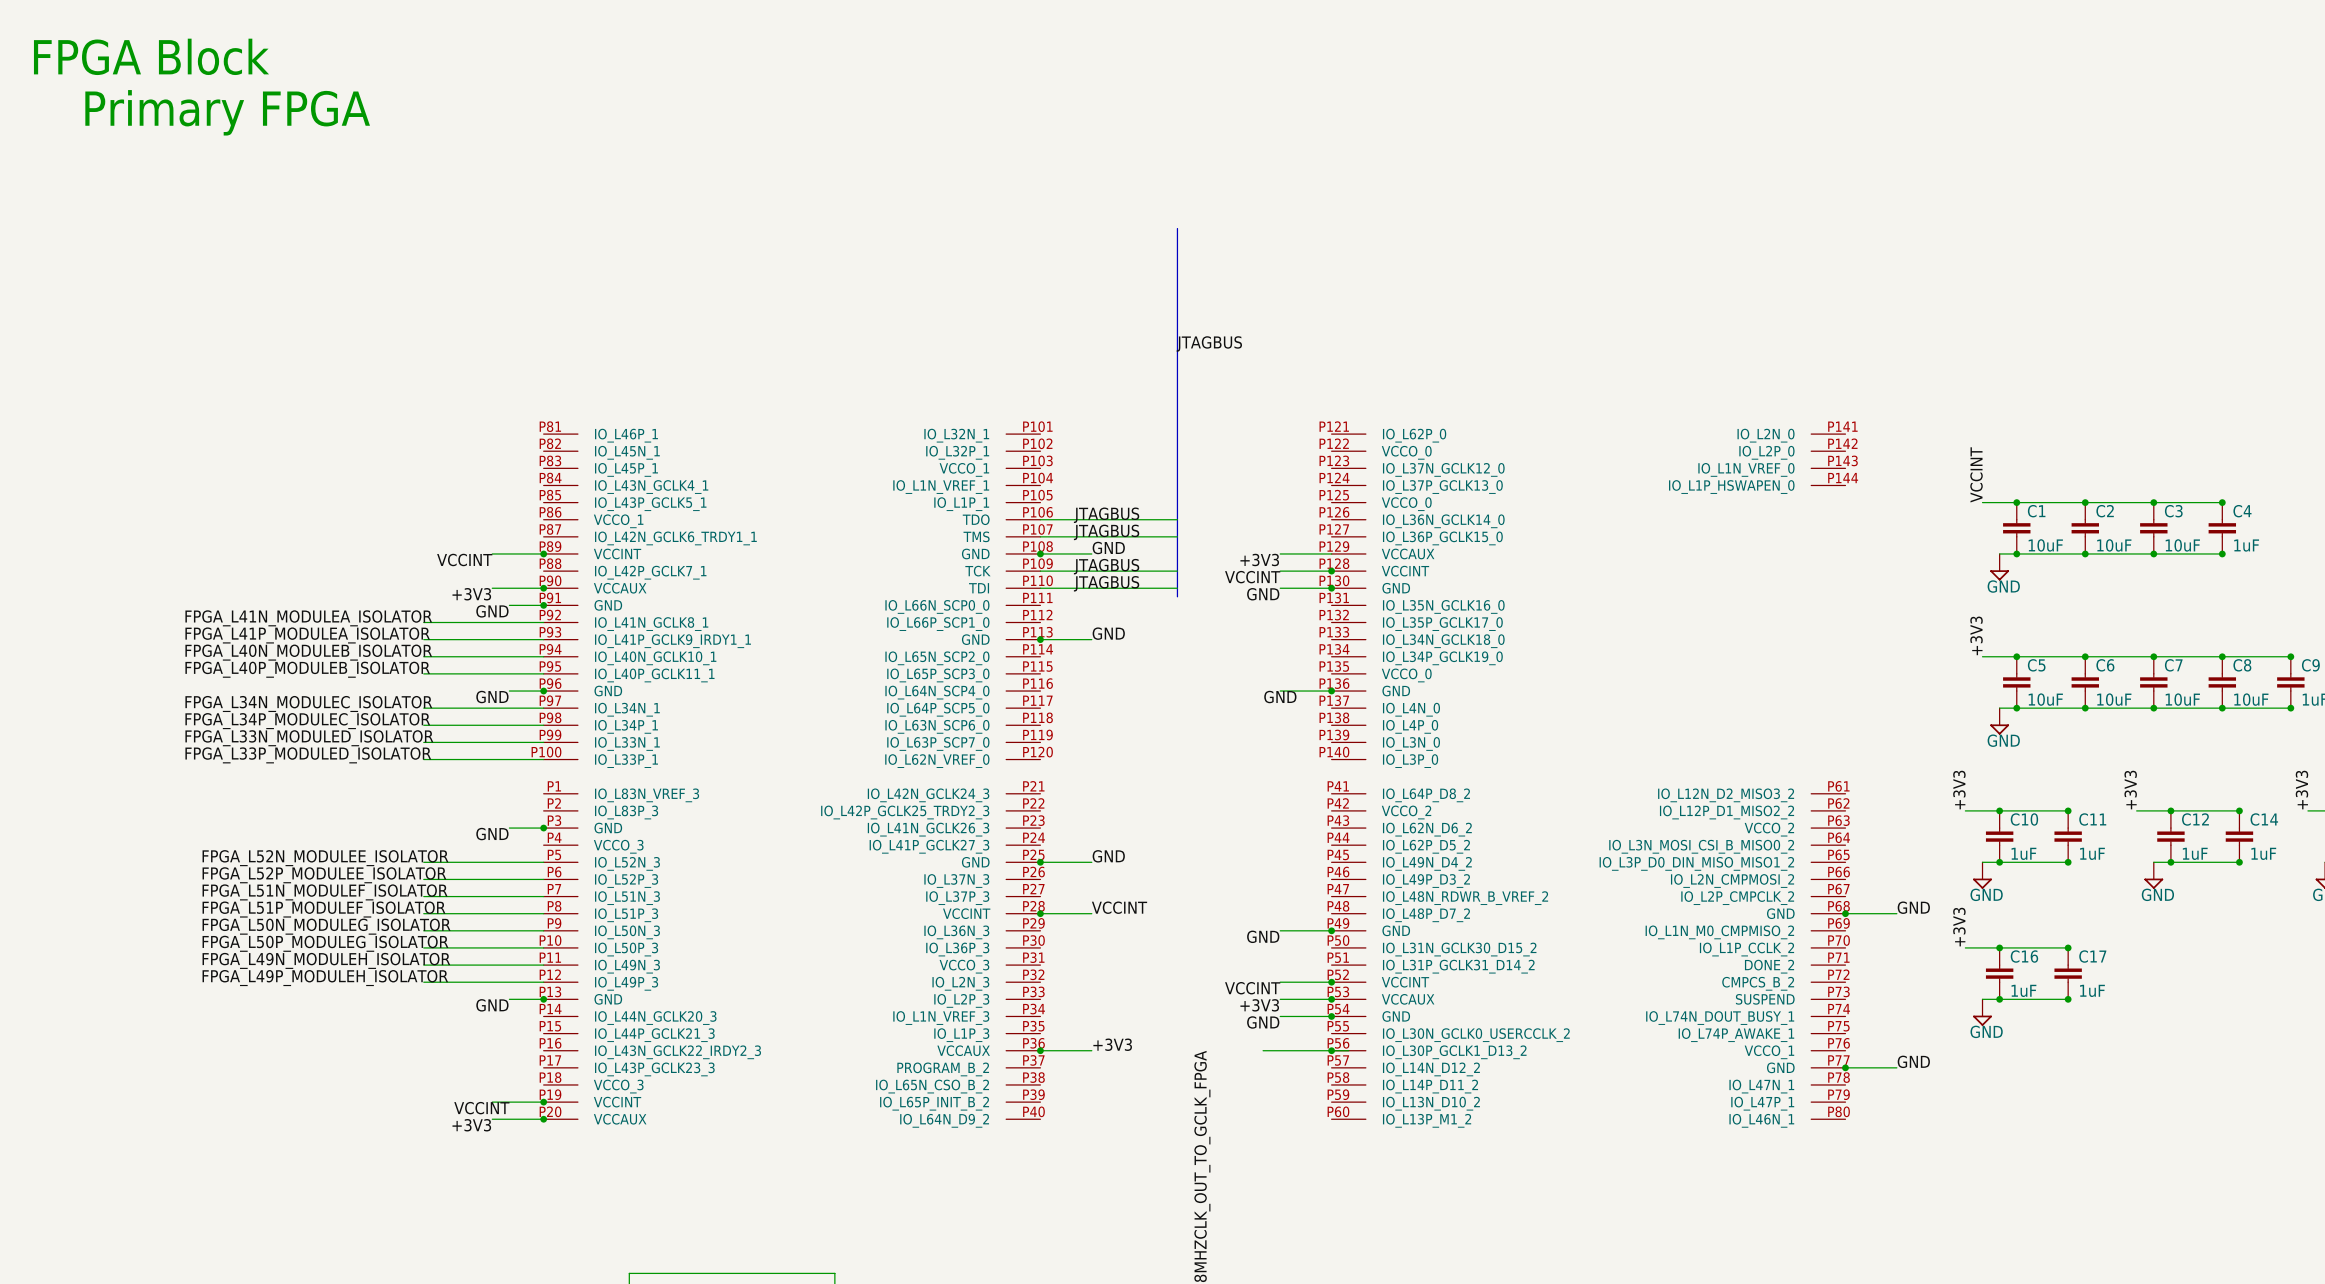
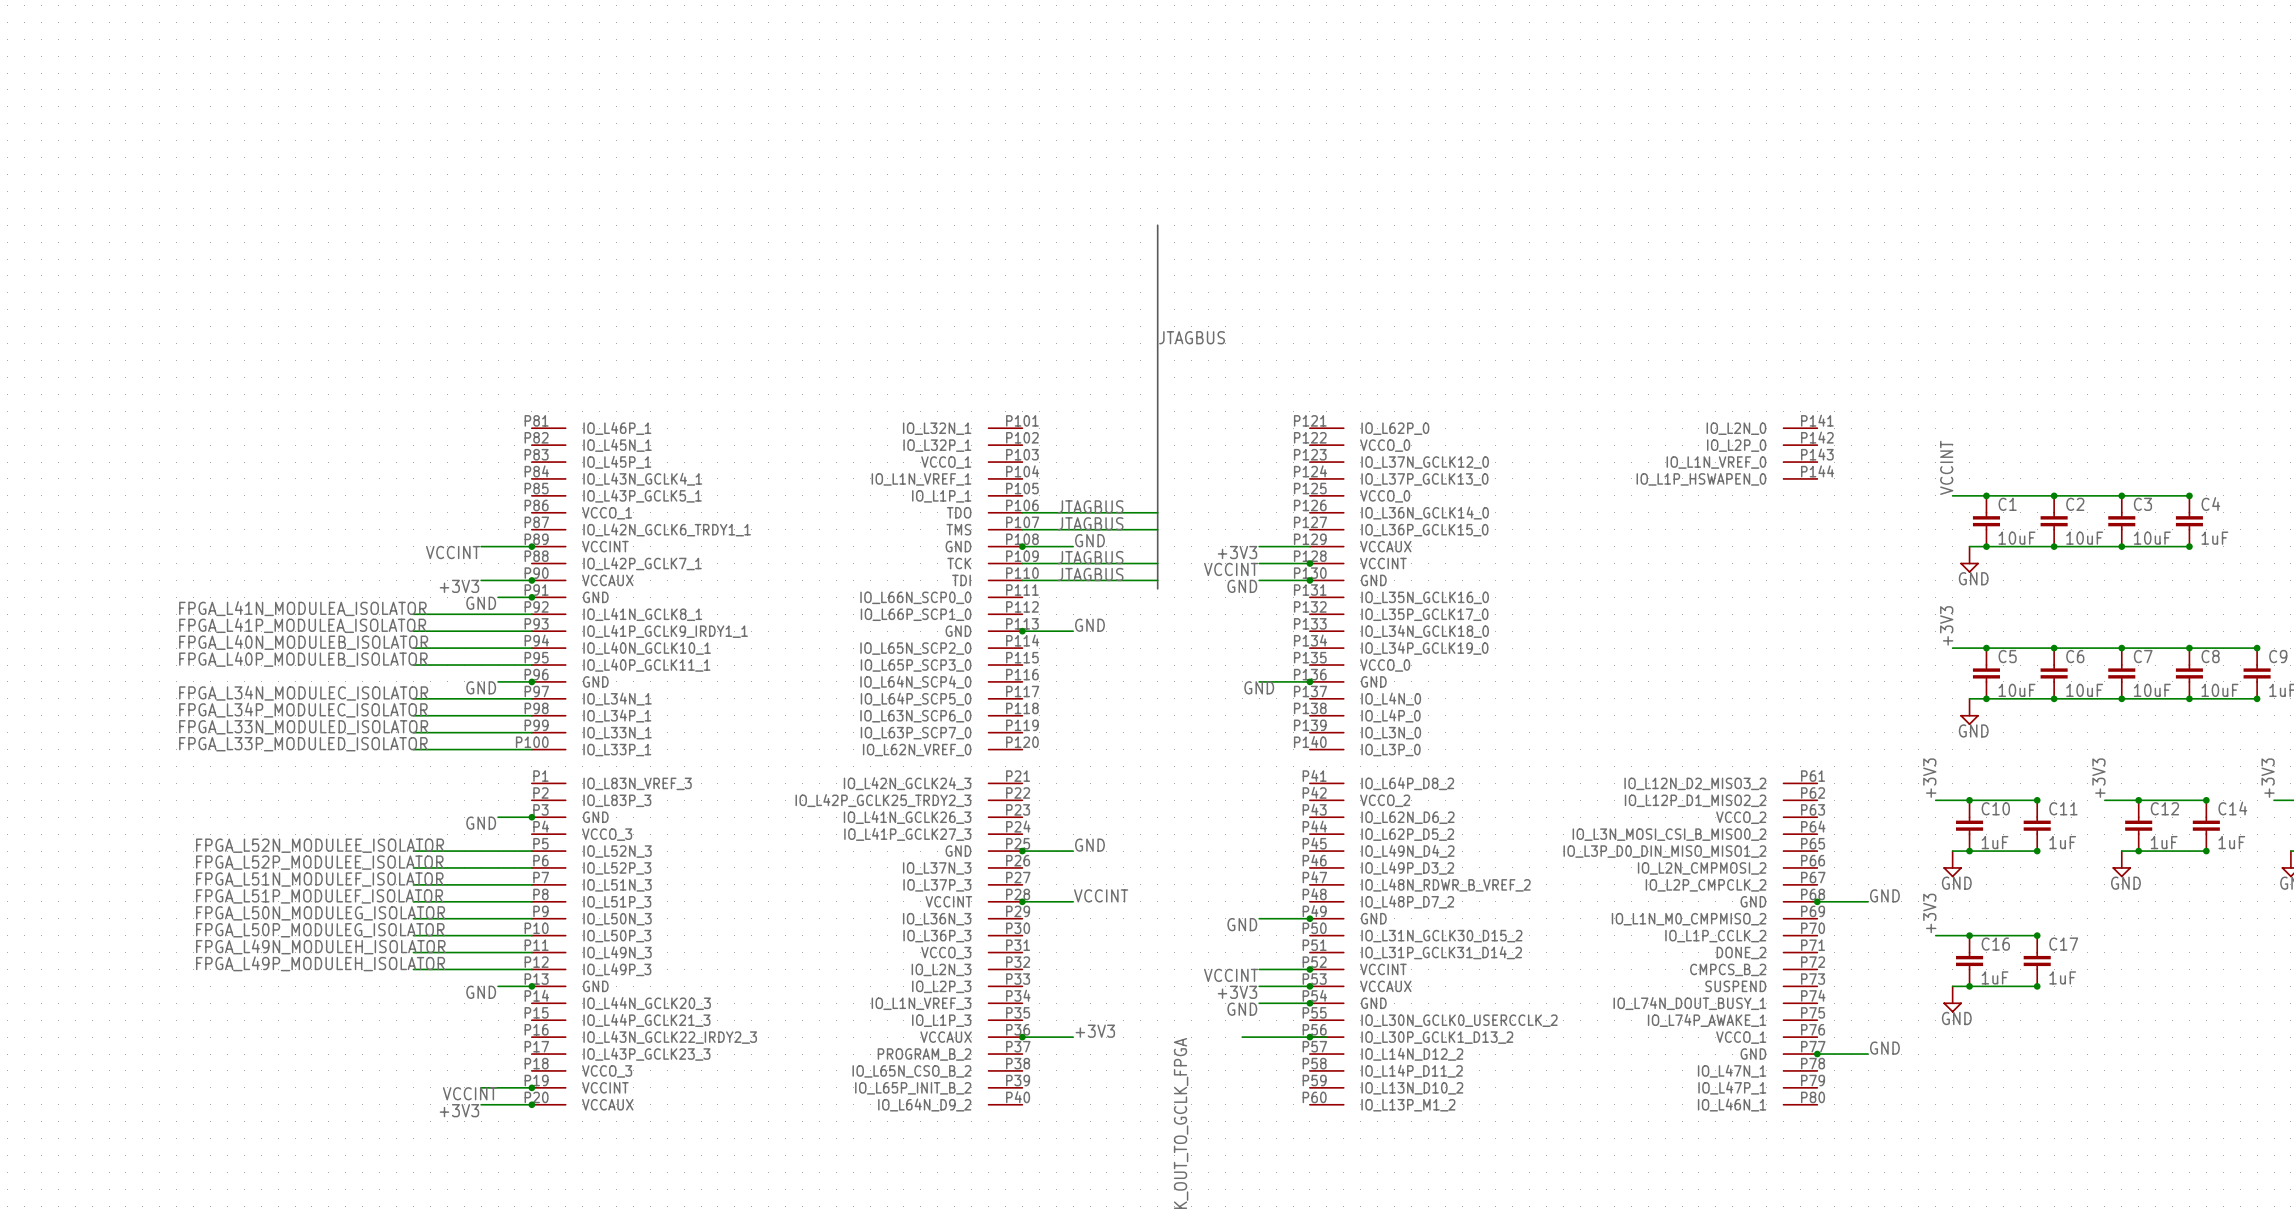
text: FPGA Block (151, 56) -> none
text: Primary FPGA (227, 112) -> none

